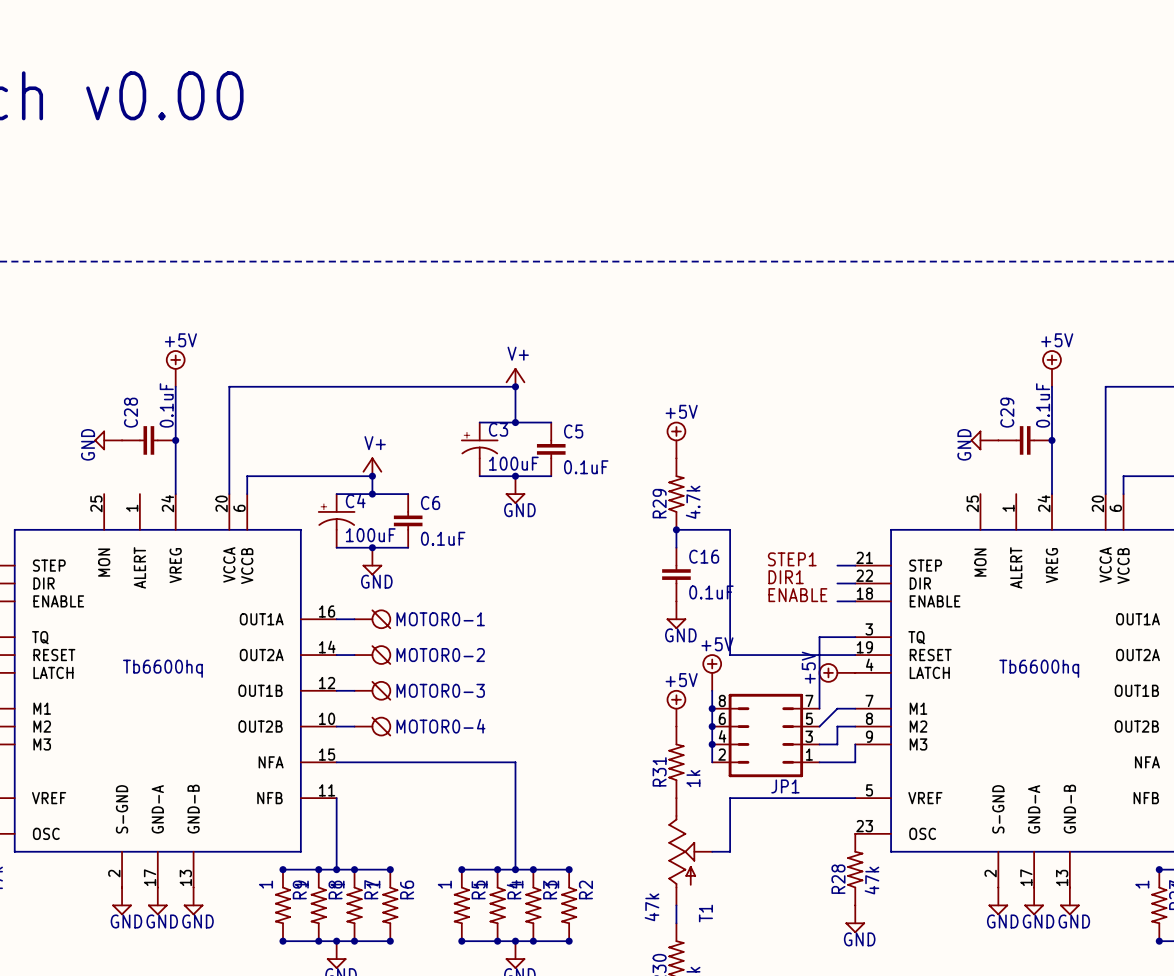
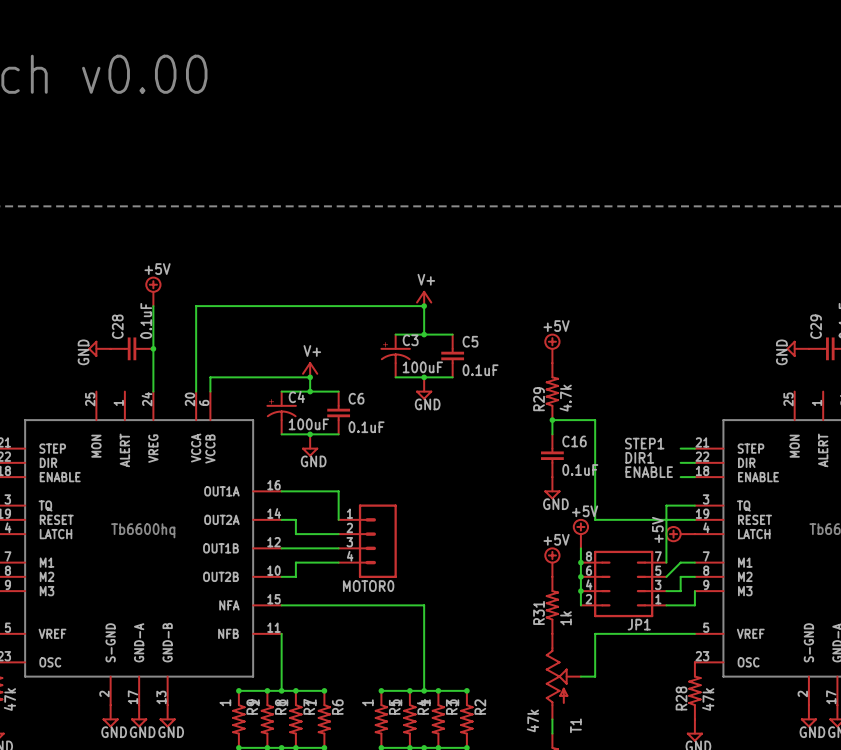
wire: none -> (295, 491) (338, 491) (338, 519)
MOTOR0-1: (372, 619) -> none
wire: none -> (295, 519) (295, 534) (338, 534)
MOTOR0-2: (372, 655) -> none
MOTOR0: none -> (367, 541)
MOTOR0-3: (372, 690) -> none
wire: none -> (338, 562) (295, 562) (295, 576)
MOTOR0-4: (372, 726) -> none

